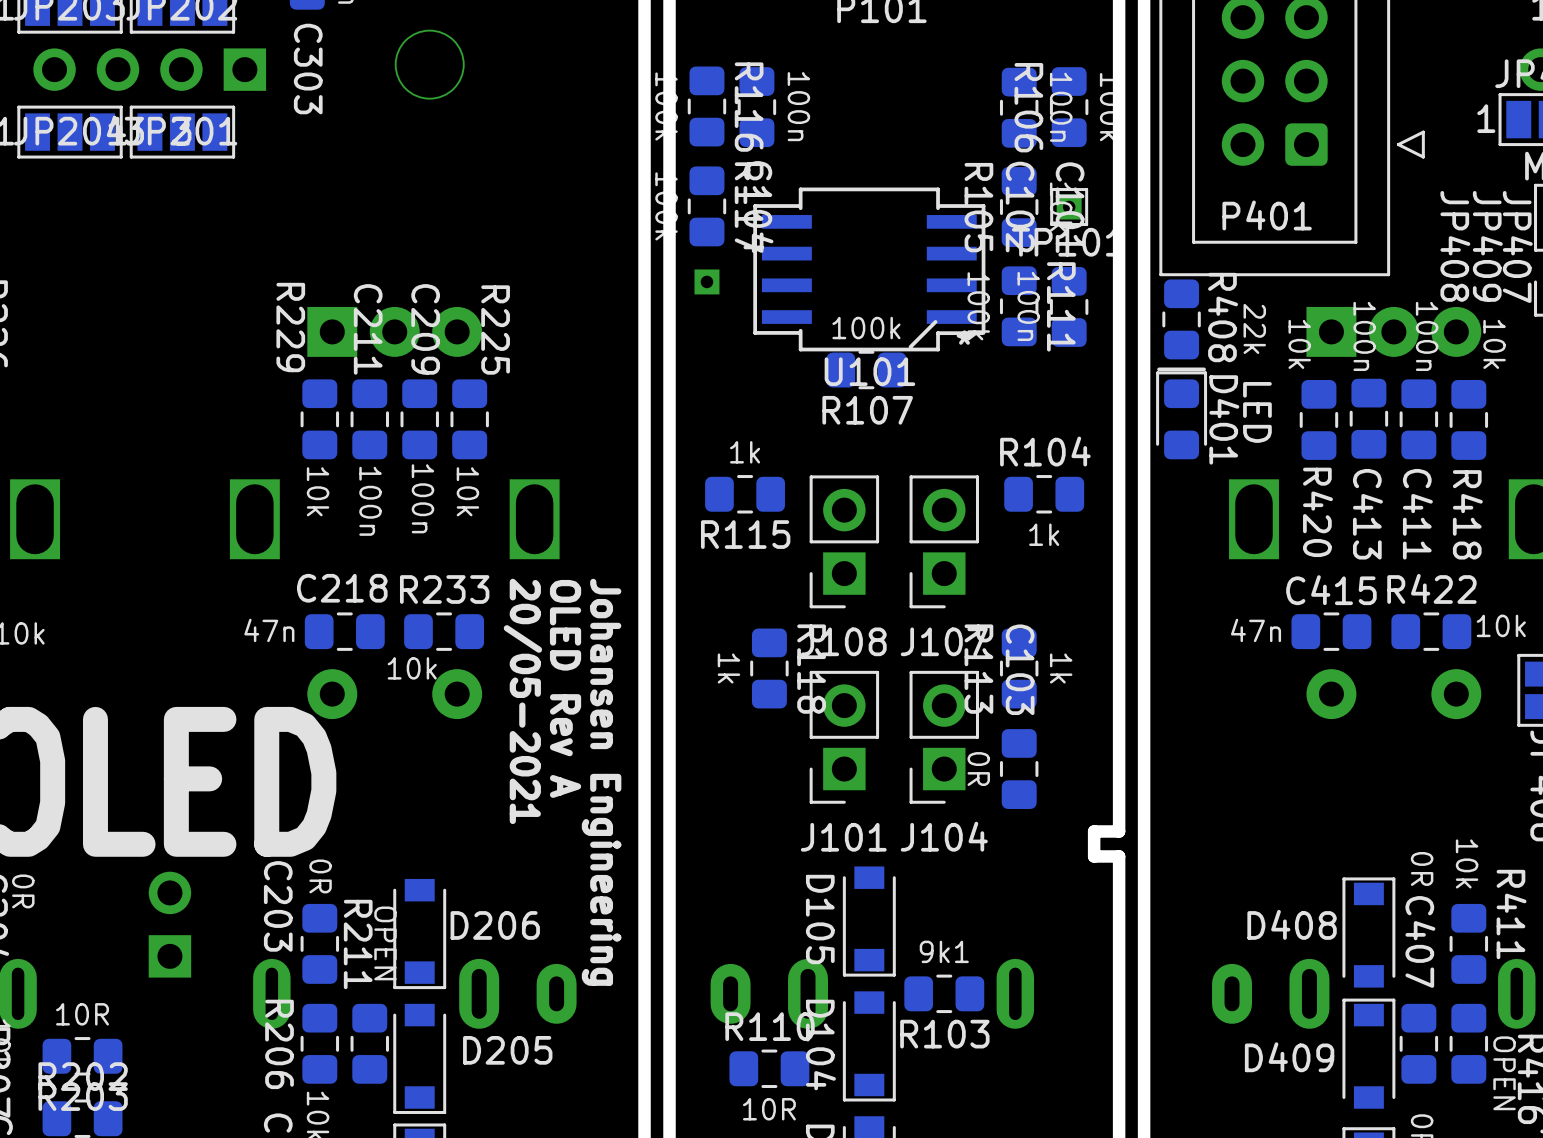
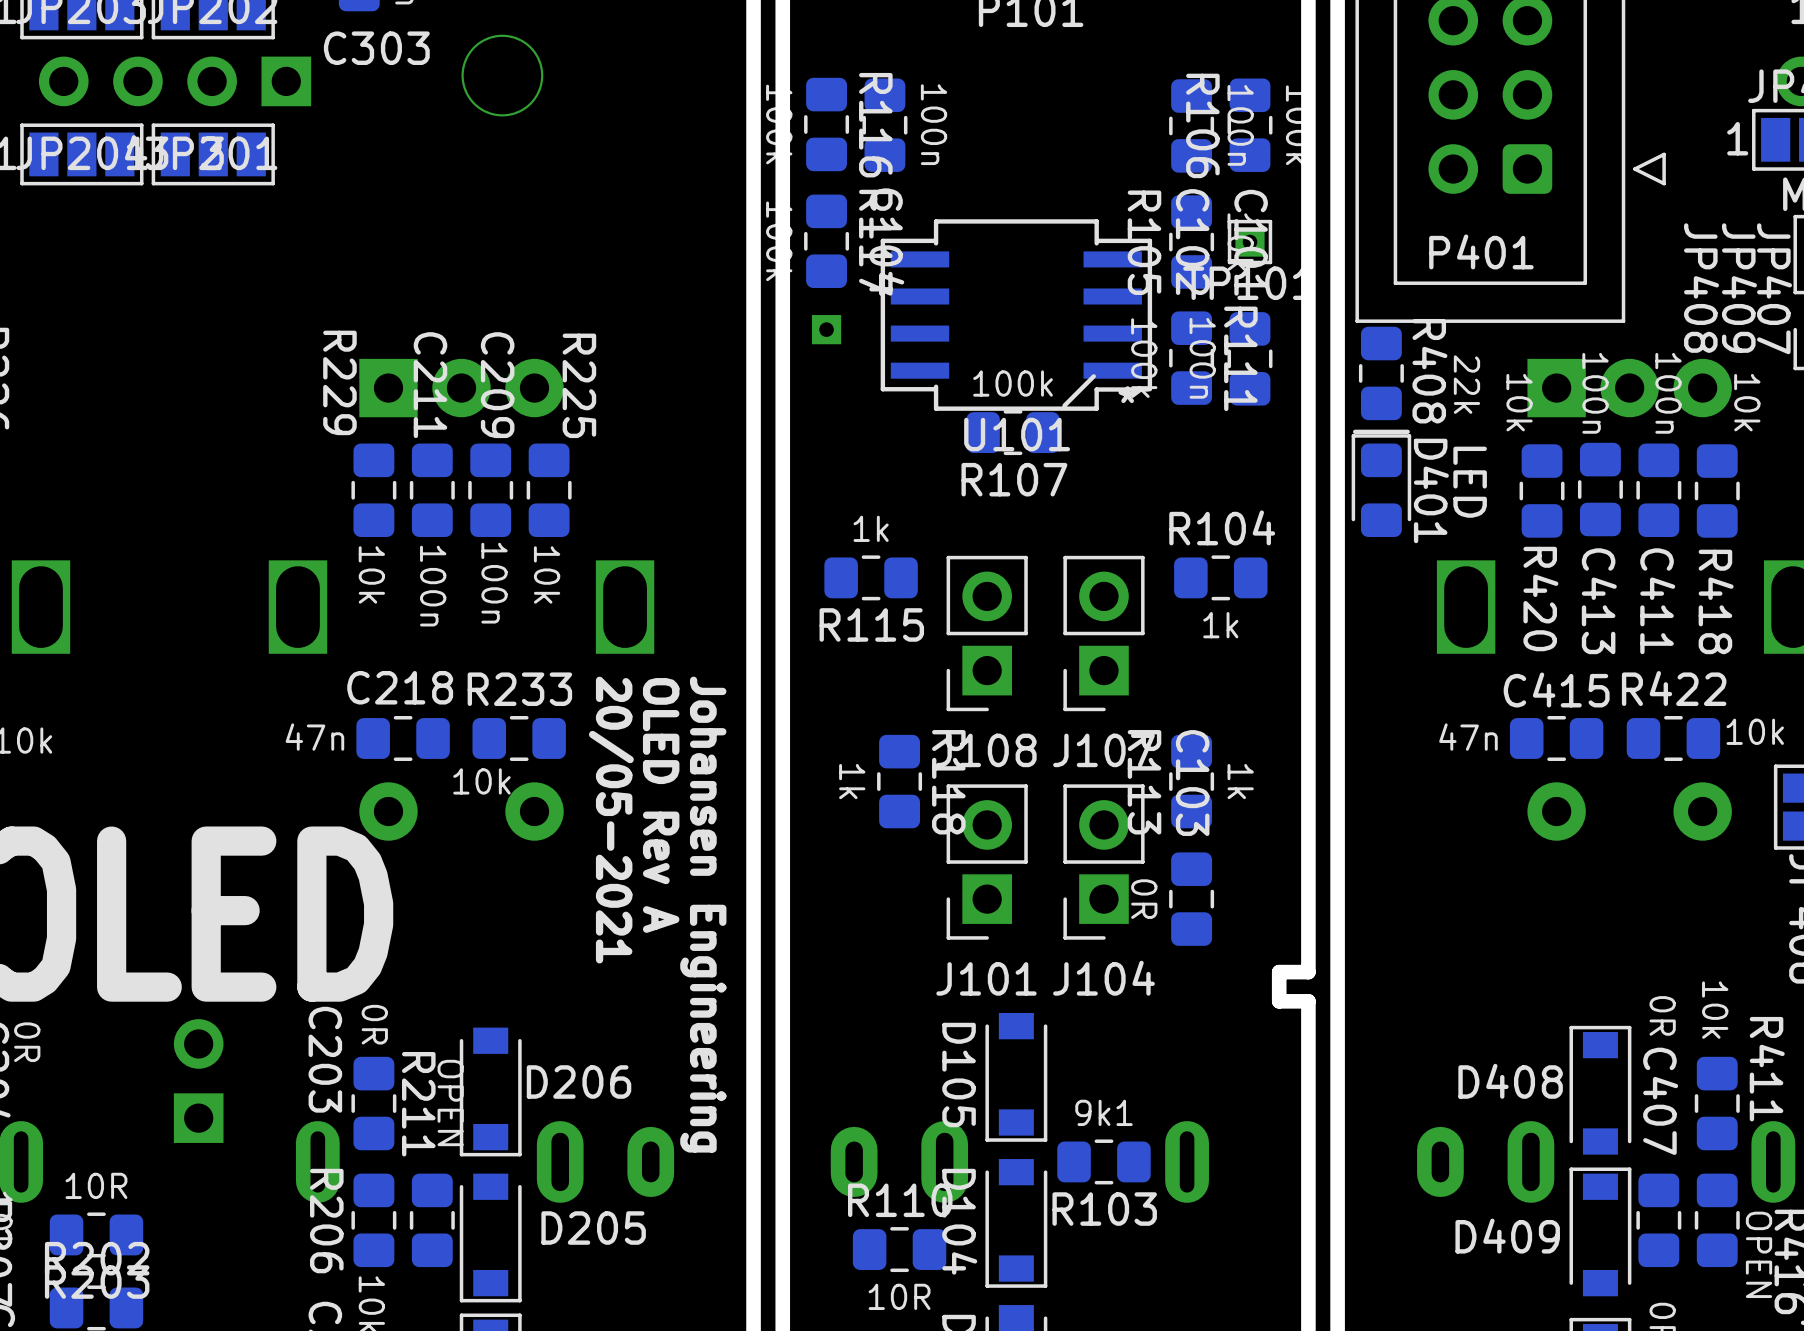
C303 name rotation: 0° (308, 69) -> 90° counterclockwise (376, 48)

